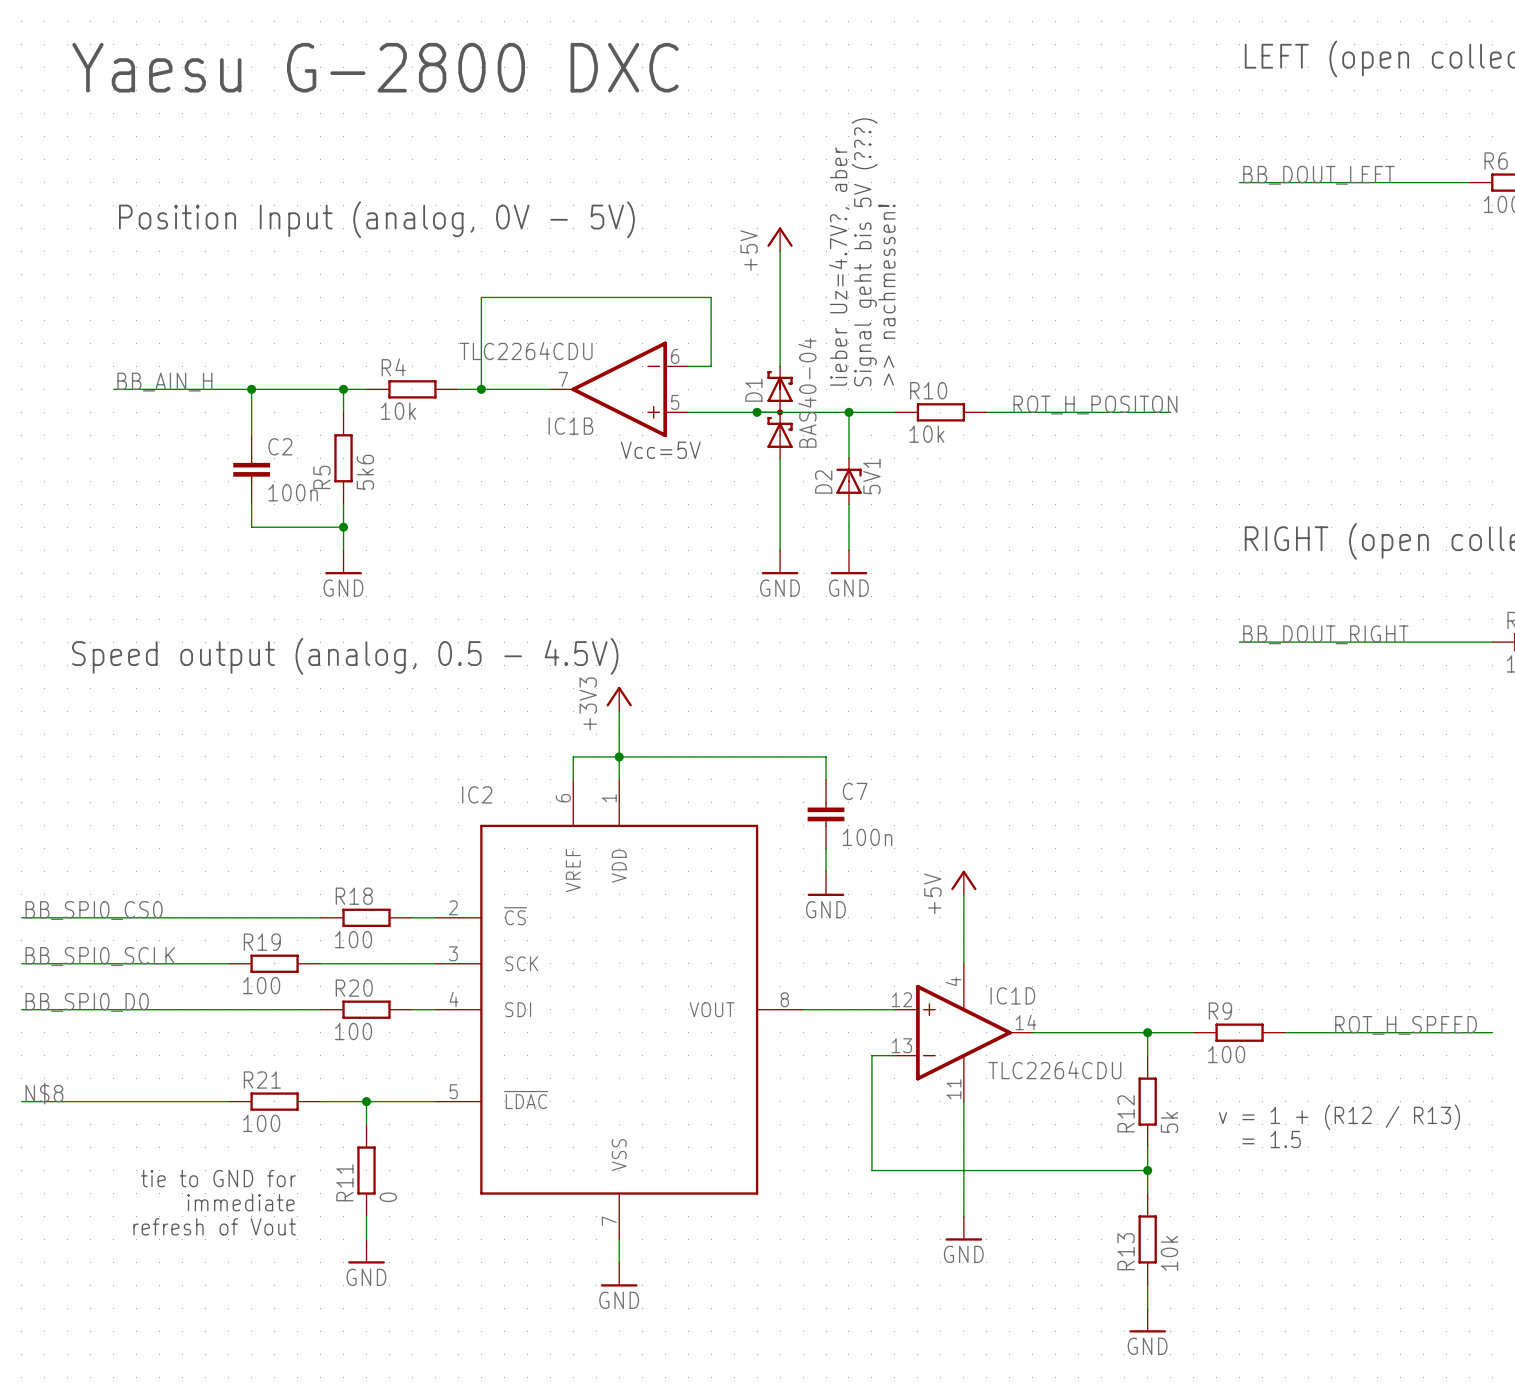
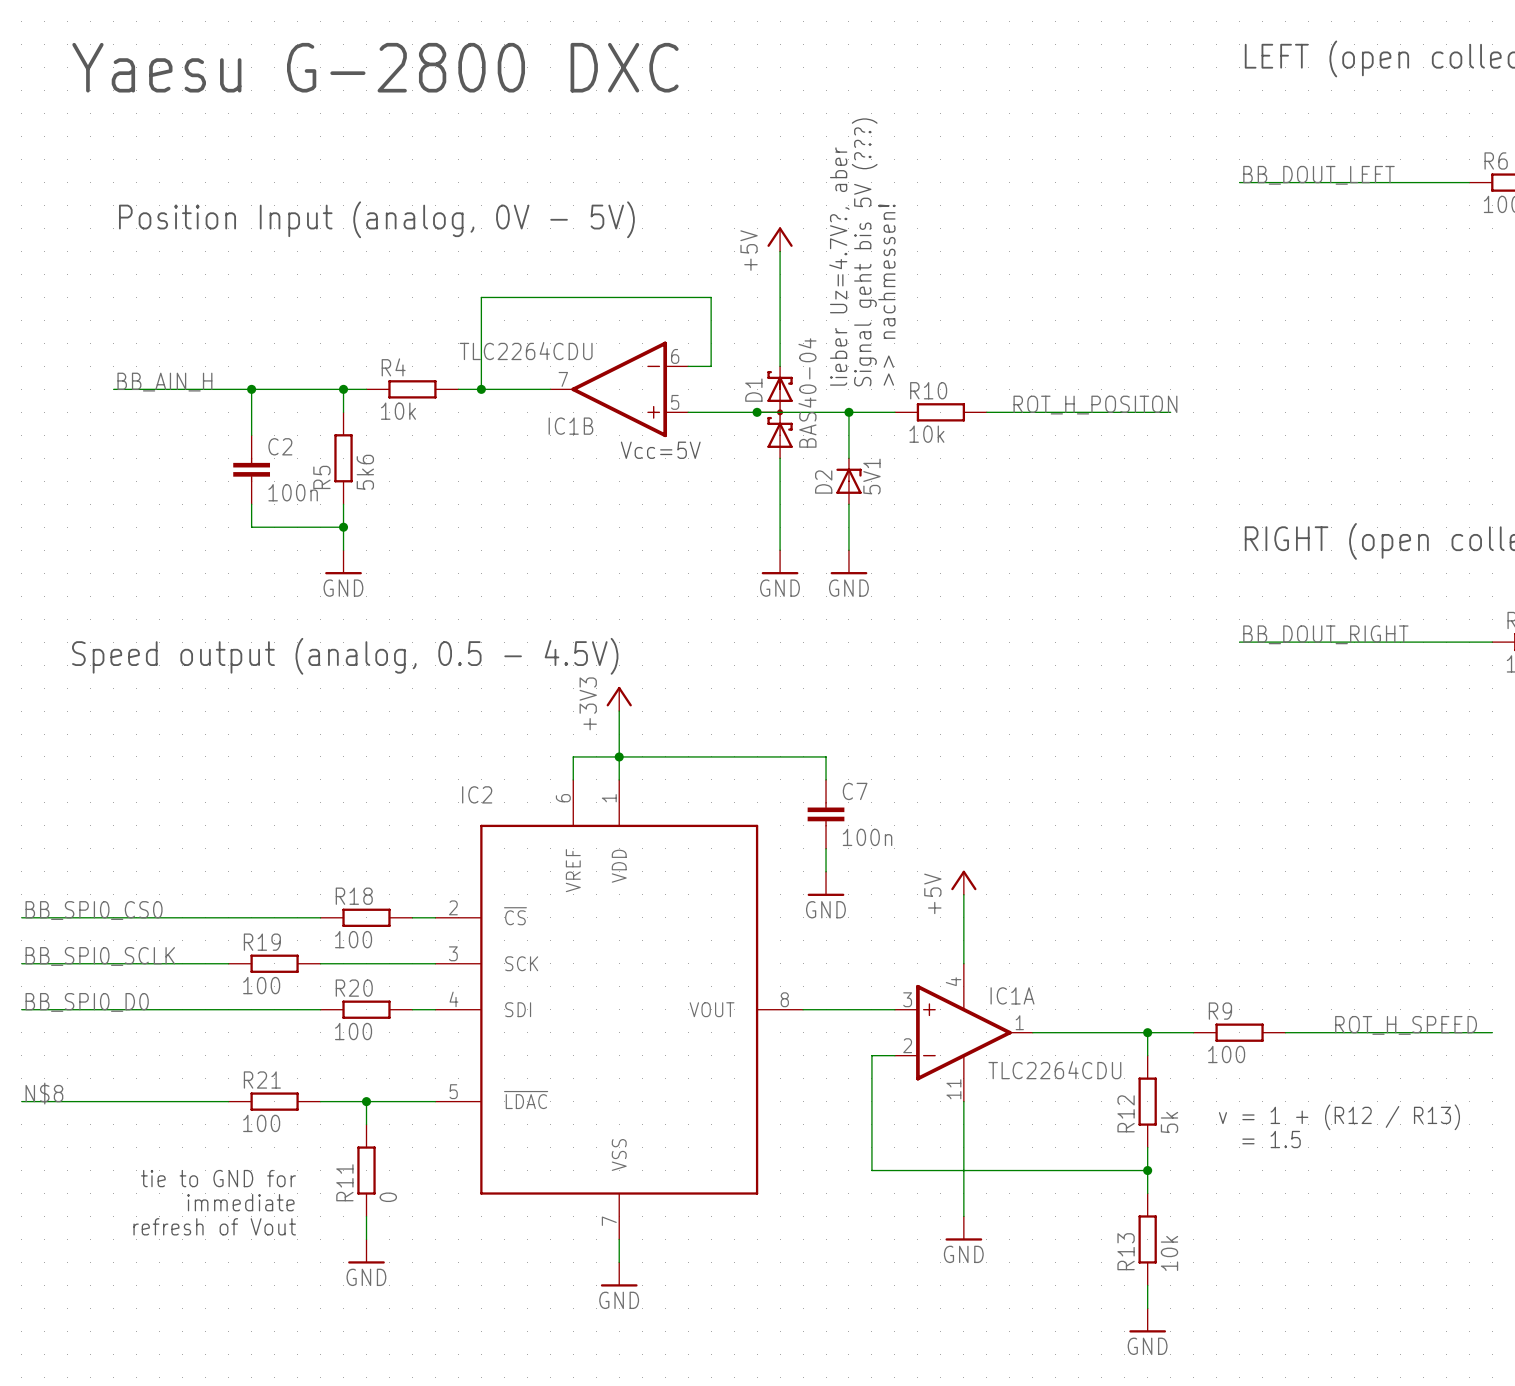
IC1D name: IC1D (1012, 995) -> IC1A (1012, 995)
IC1D pin number: 12 (902, 999) -> 3 (907, 999)
IC1D pin number: 14 (1026, 1022) -> 1 (1019, 1022)
IC1D pin number: 13 (902, 1045) -> 2 (907, 1045)

